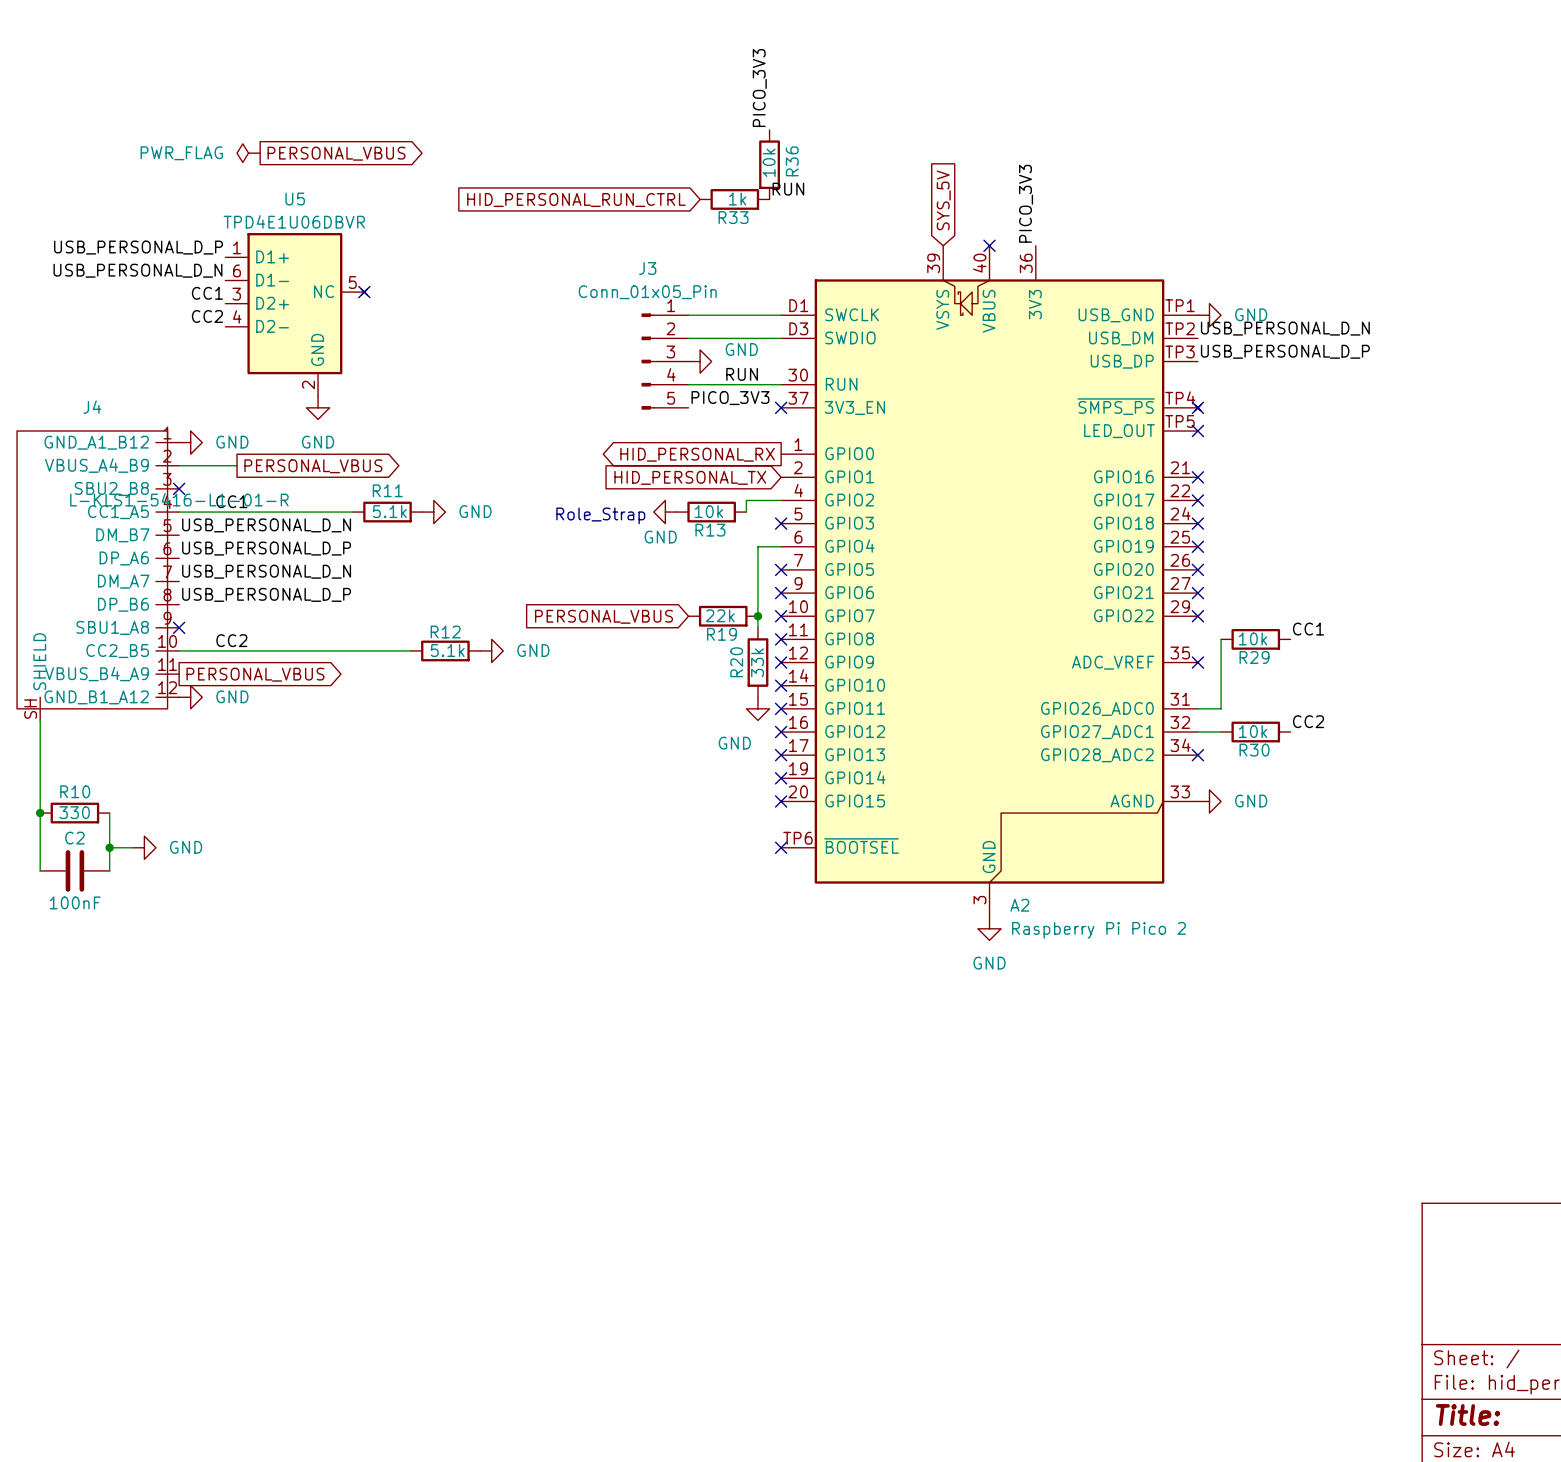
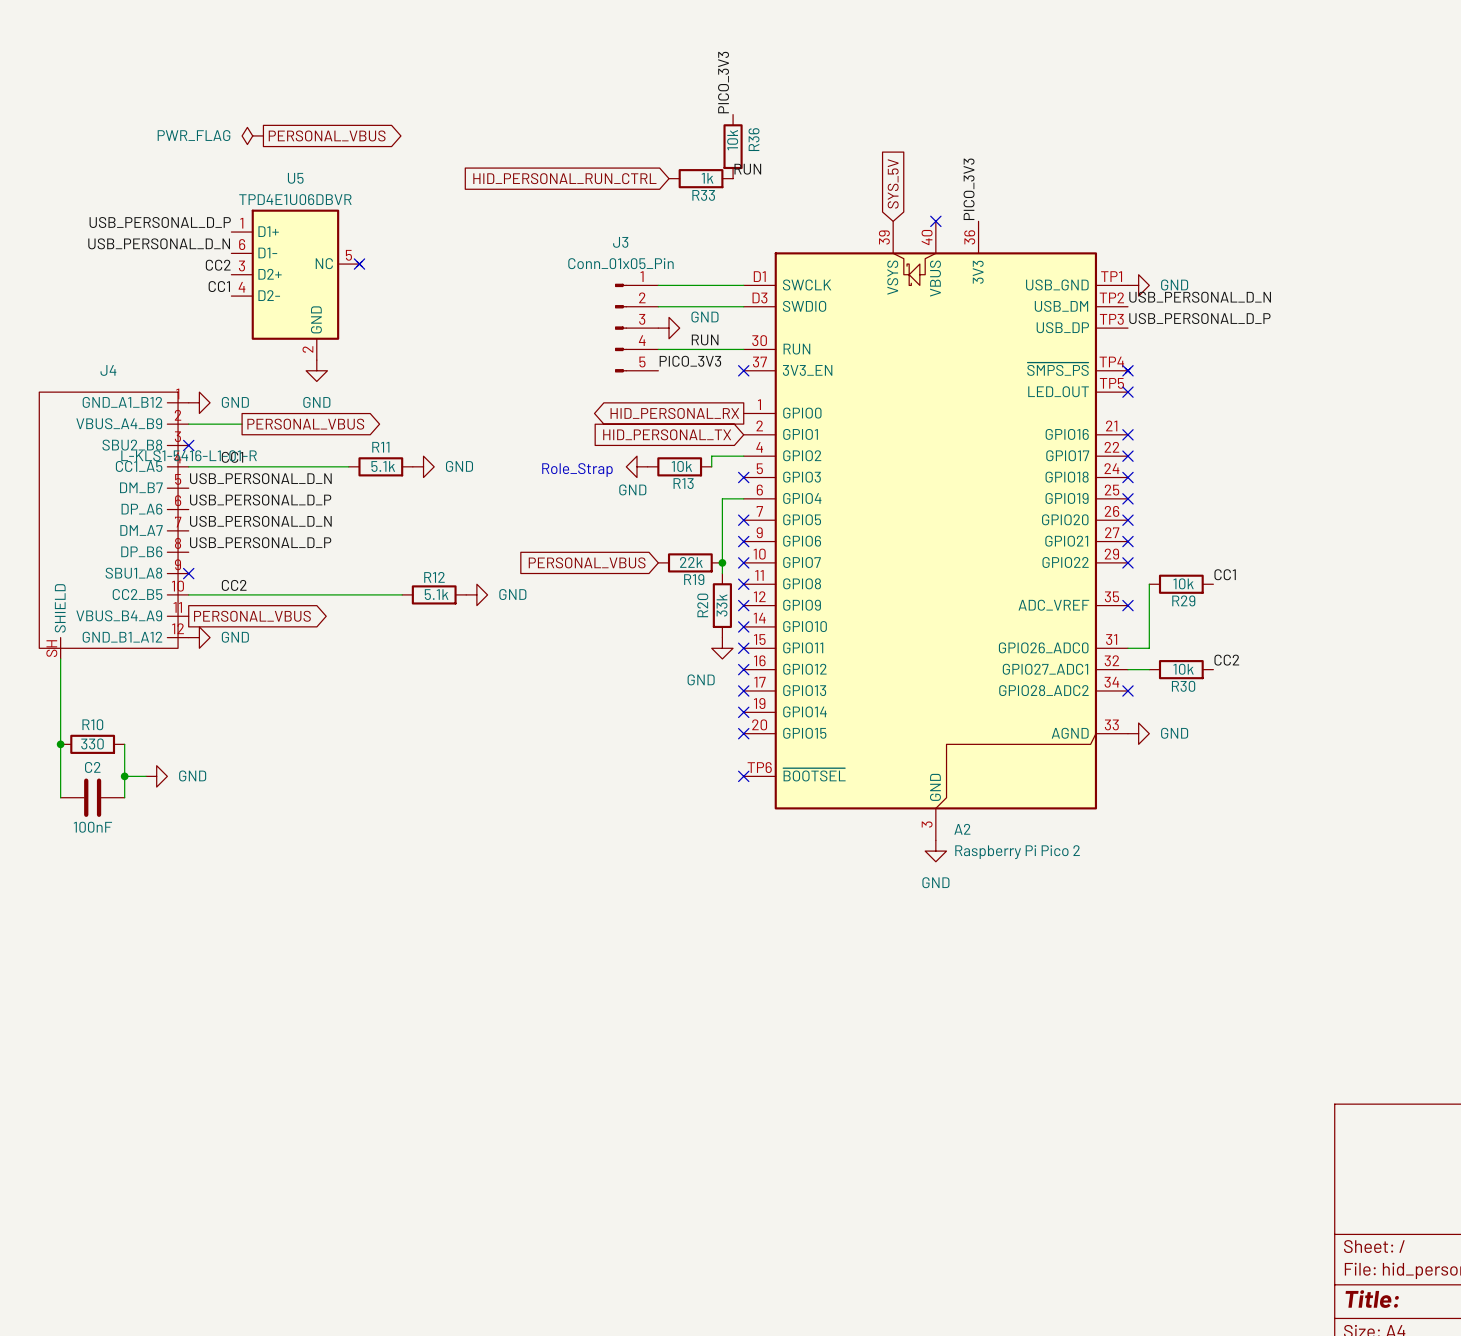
label: CC1 (207, 293) -> CC2 (218, 265)
label: CC2 (207, 316) -> CC1 (219, 286)

